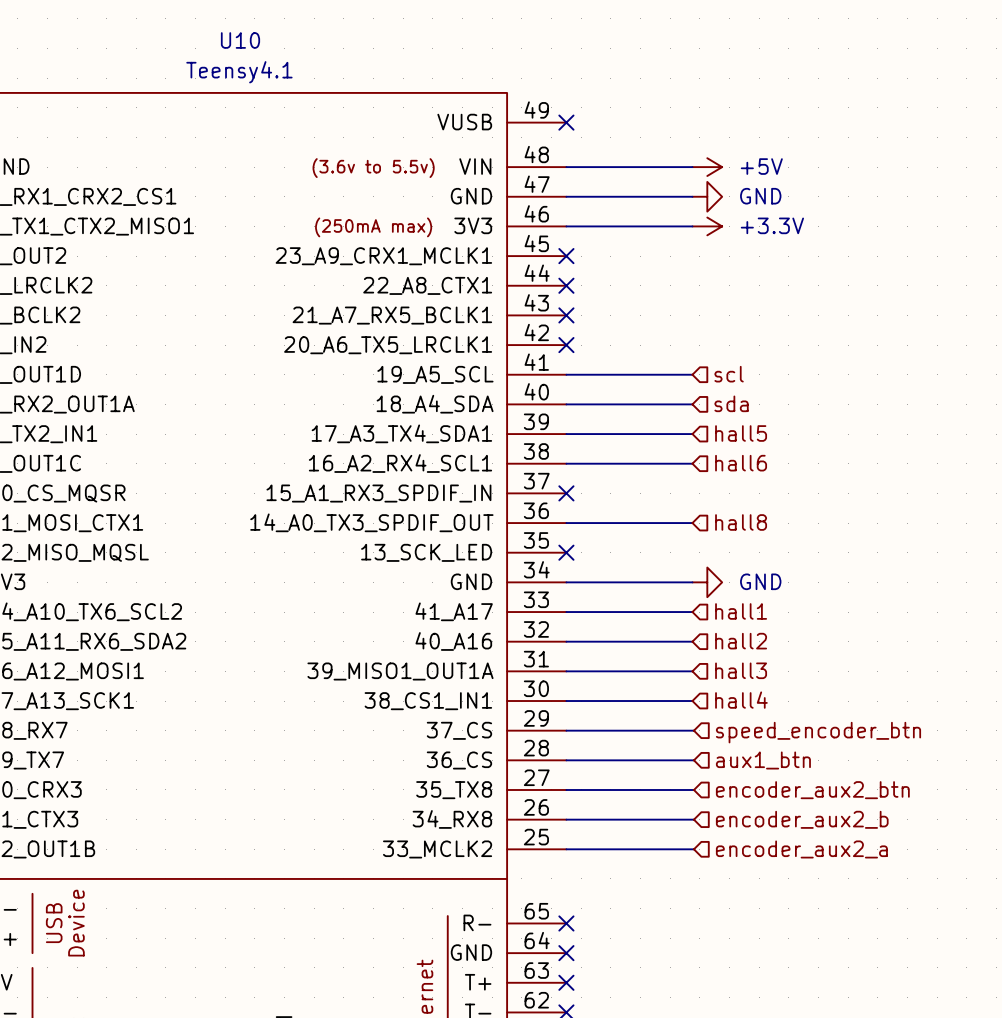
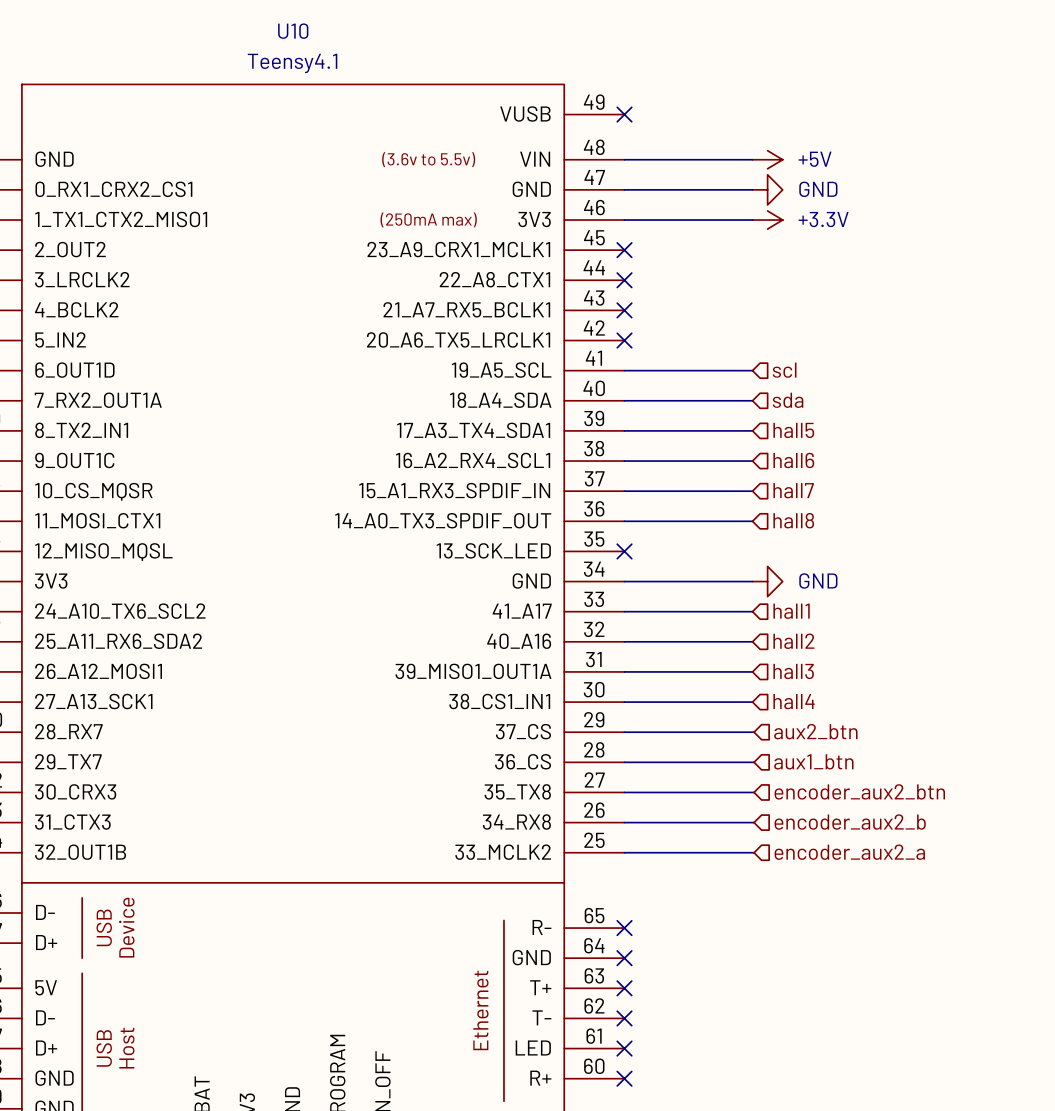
hierarchical label: none -> hall7 (793, 490)
wire: none -> (624, 491) (752, 491)
no-connect mark: (566, 493) -> none
hierarchical label: speed_encoder_btn (818, 732) -> aux2_btn (815, 731)

